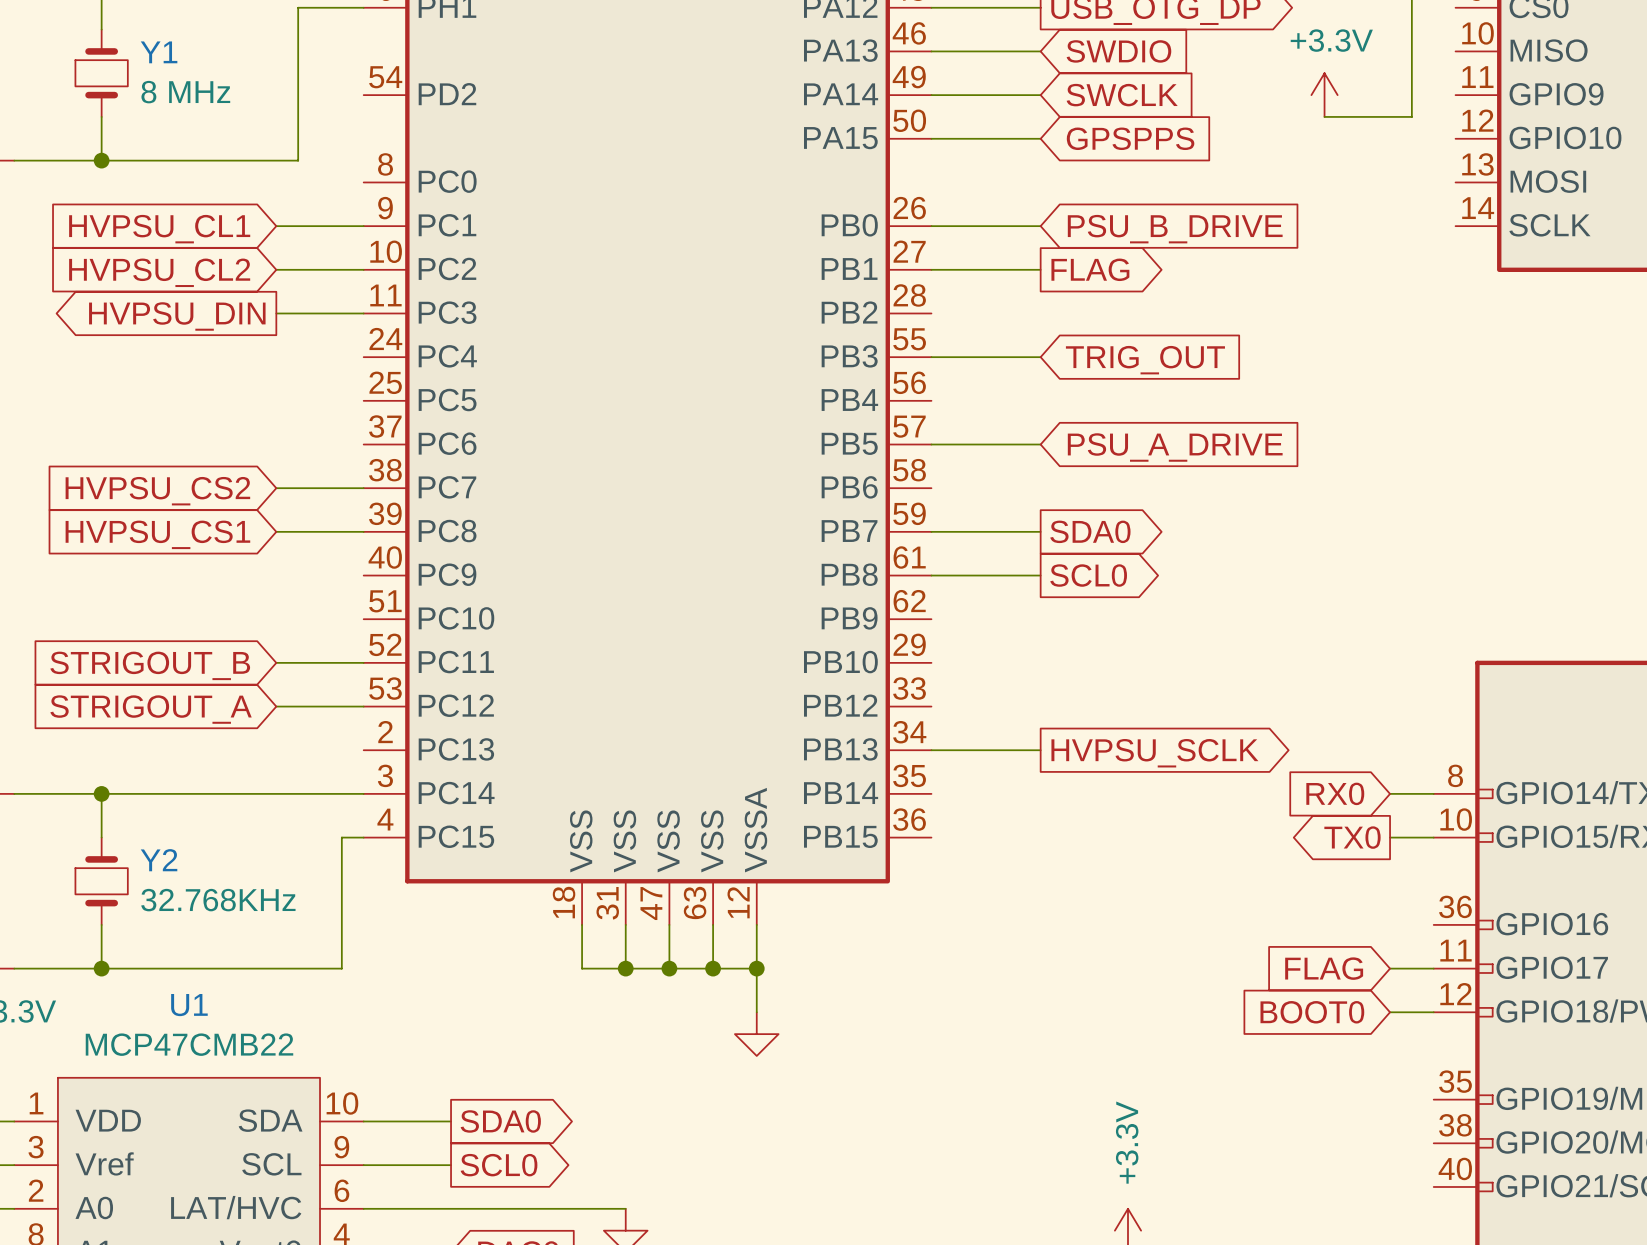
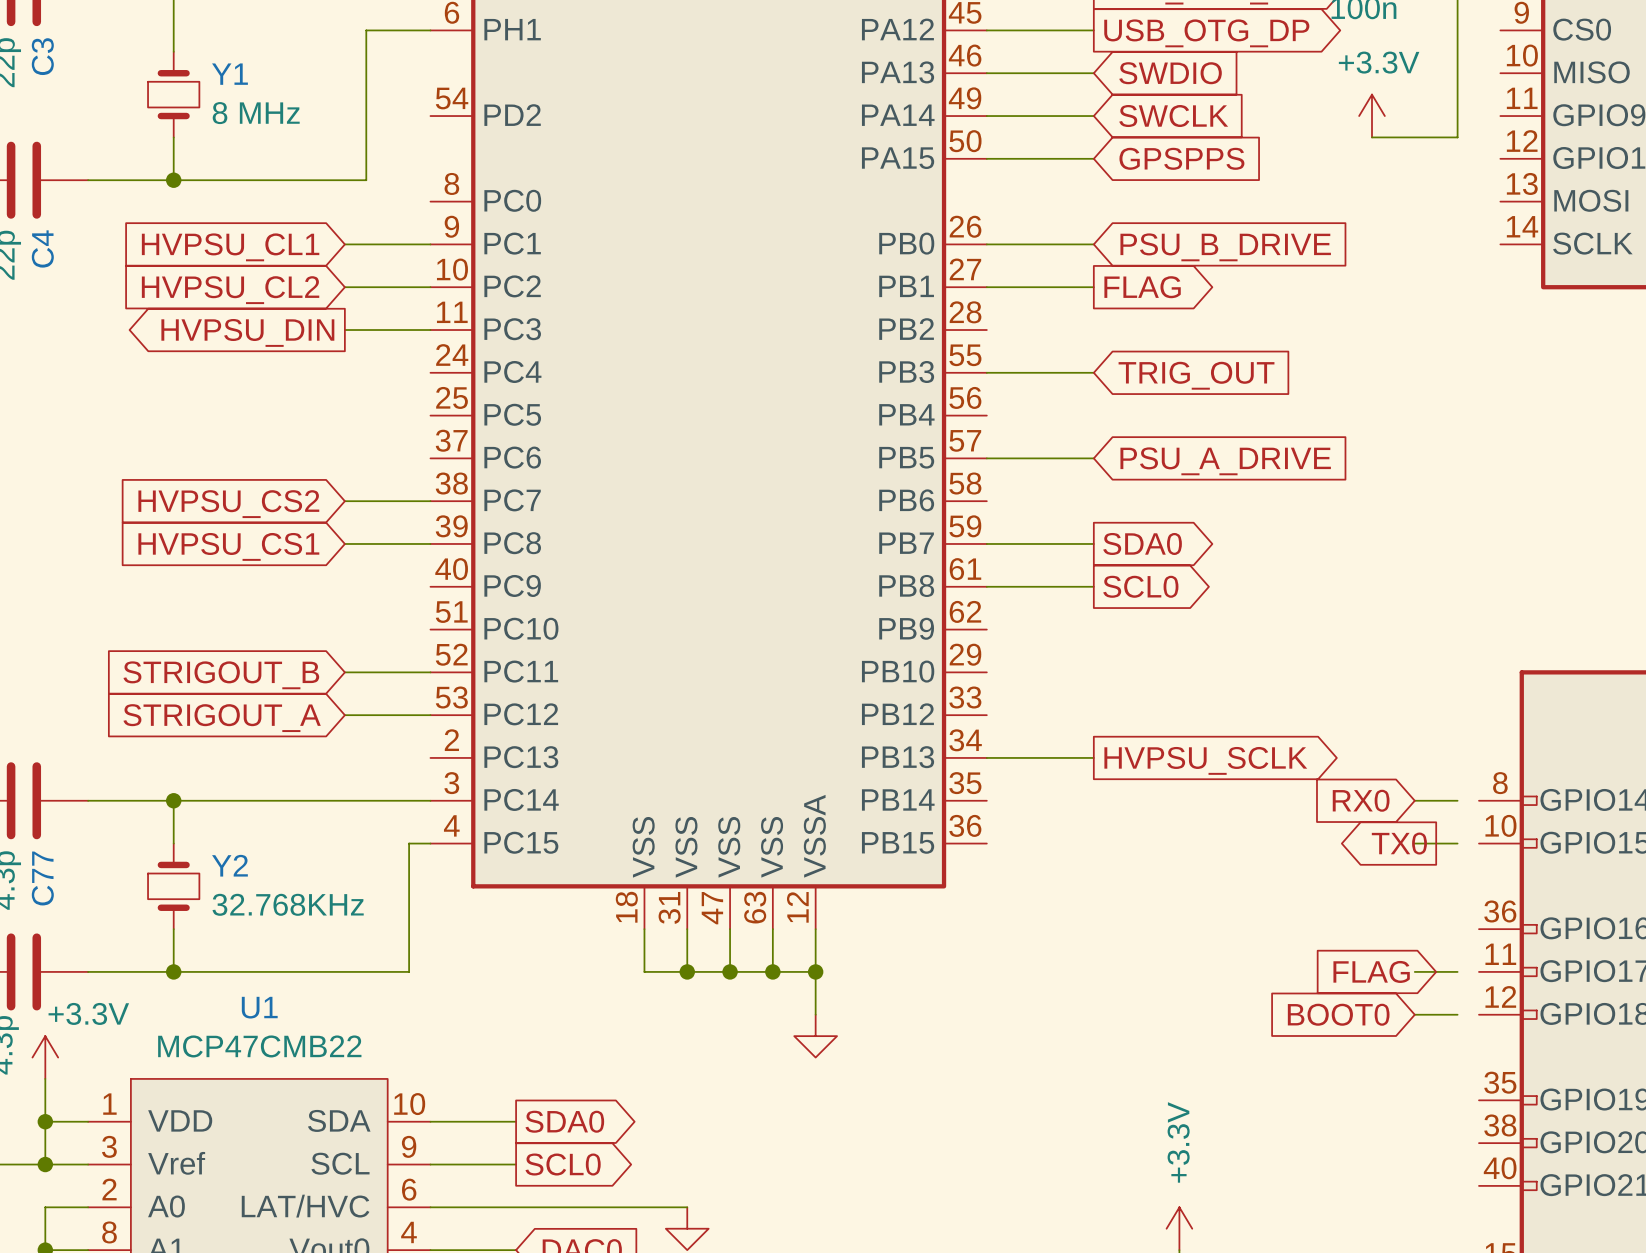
global label position: RX0 (1335, 793) -> RX0 (1361, 800)
wire: (1411, 793) (1433, 793) -> (1414, 800) (1436, 800)
wire: (1411, 837) (1433, 837) -> (1414, 843) (1436, 843)
wire: (1411, 968) (1433, 968) -> (1414, 971) (1436, 971)
global label position: BOOT0 (1312, 1012) -> BOOT0 (1338, 1014)
wire: (1411, 1012) (1433, 1012) -> (1414, 1014) (1436, 1014)

